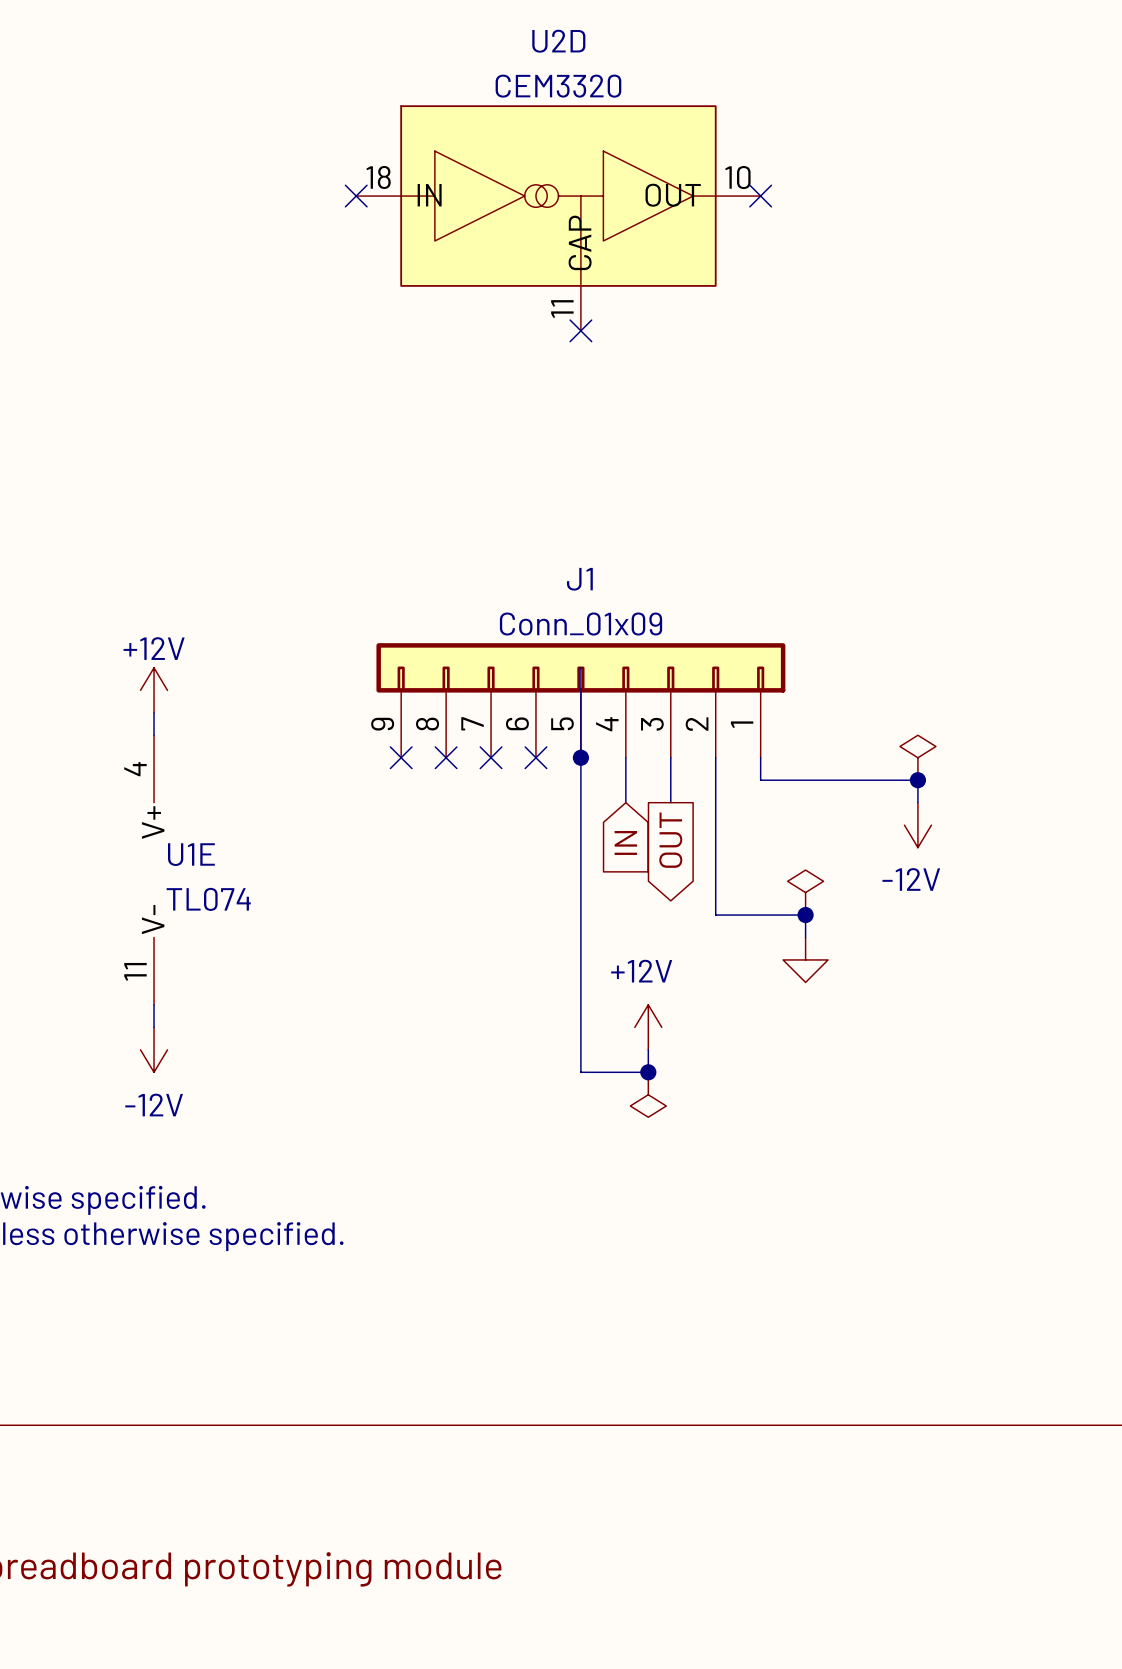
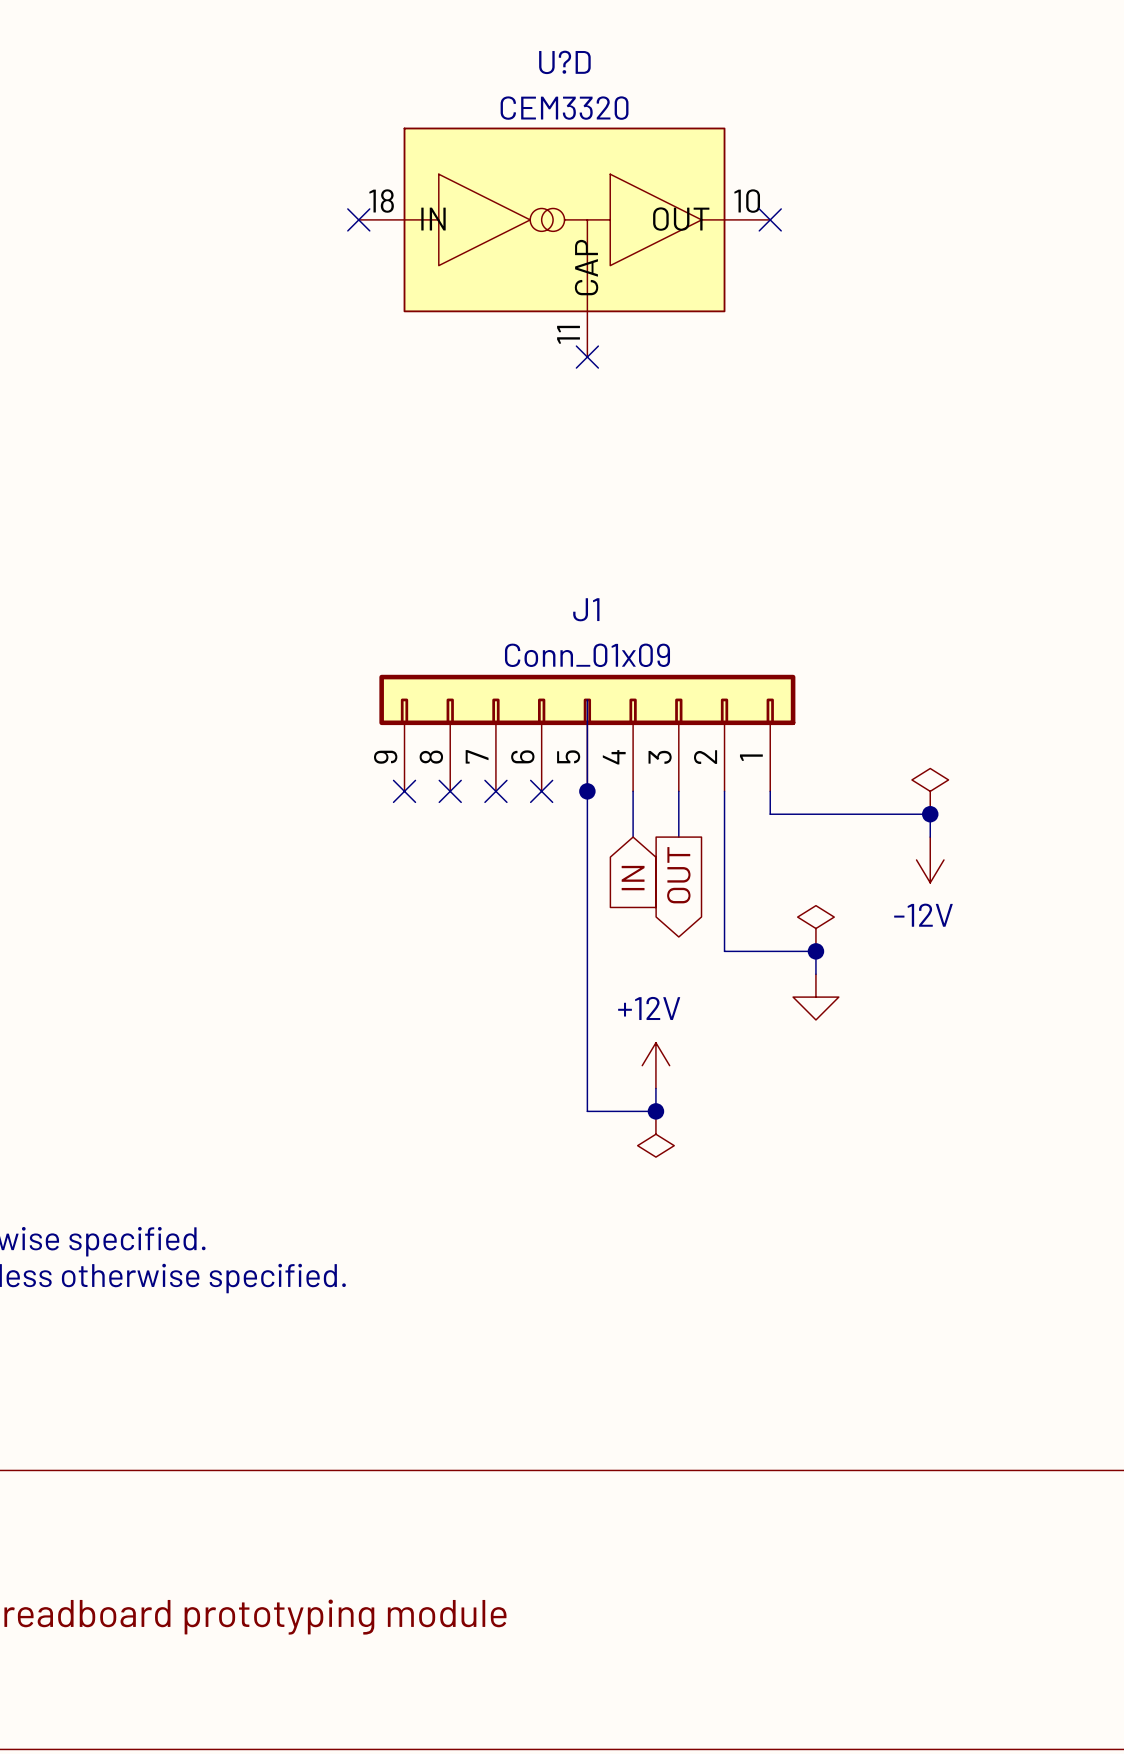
U2D name: U2D (558, 41) -> U?D (564, 62)
power symbol: +12V (154, 690) -> none
wire: (154, 712) (154, 735) -> none
U1E: TL074 (154, 870) -> none
wire: (154, 1004) (154, 1027) -> none
power symbol: -12V (154, 1049) -> none

